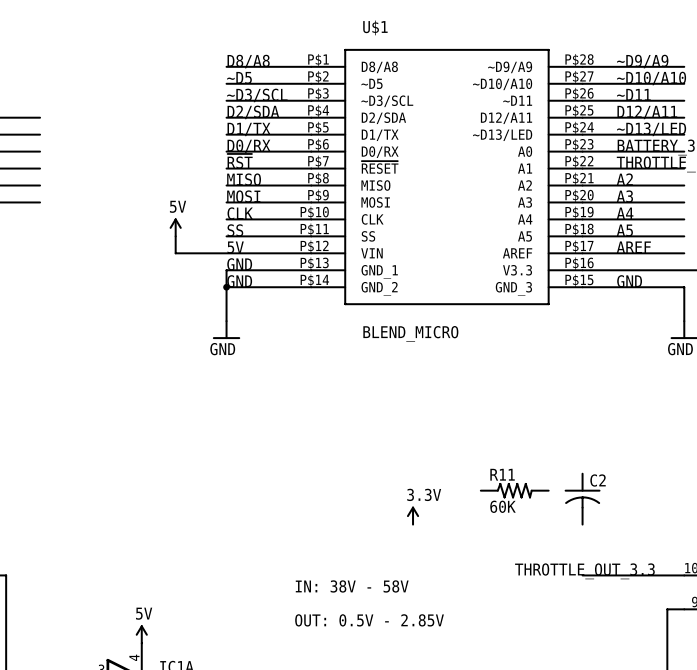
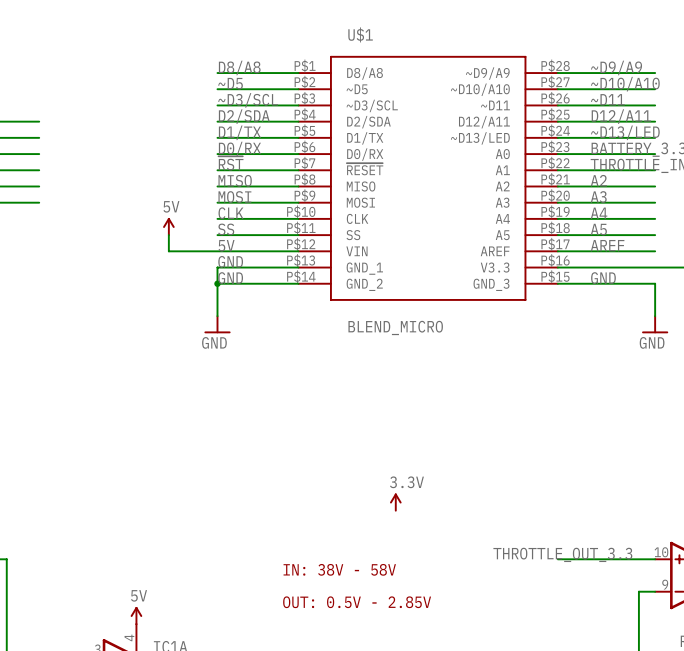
R11: 60K (514, 490) -> none
C2: (582, 499) -> none

